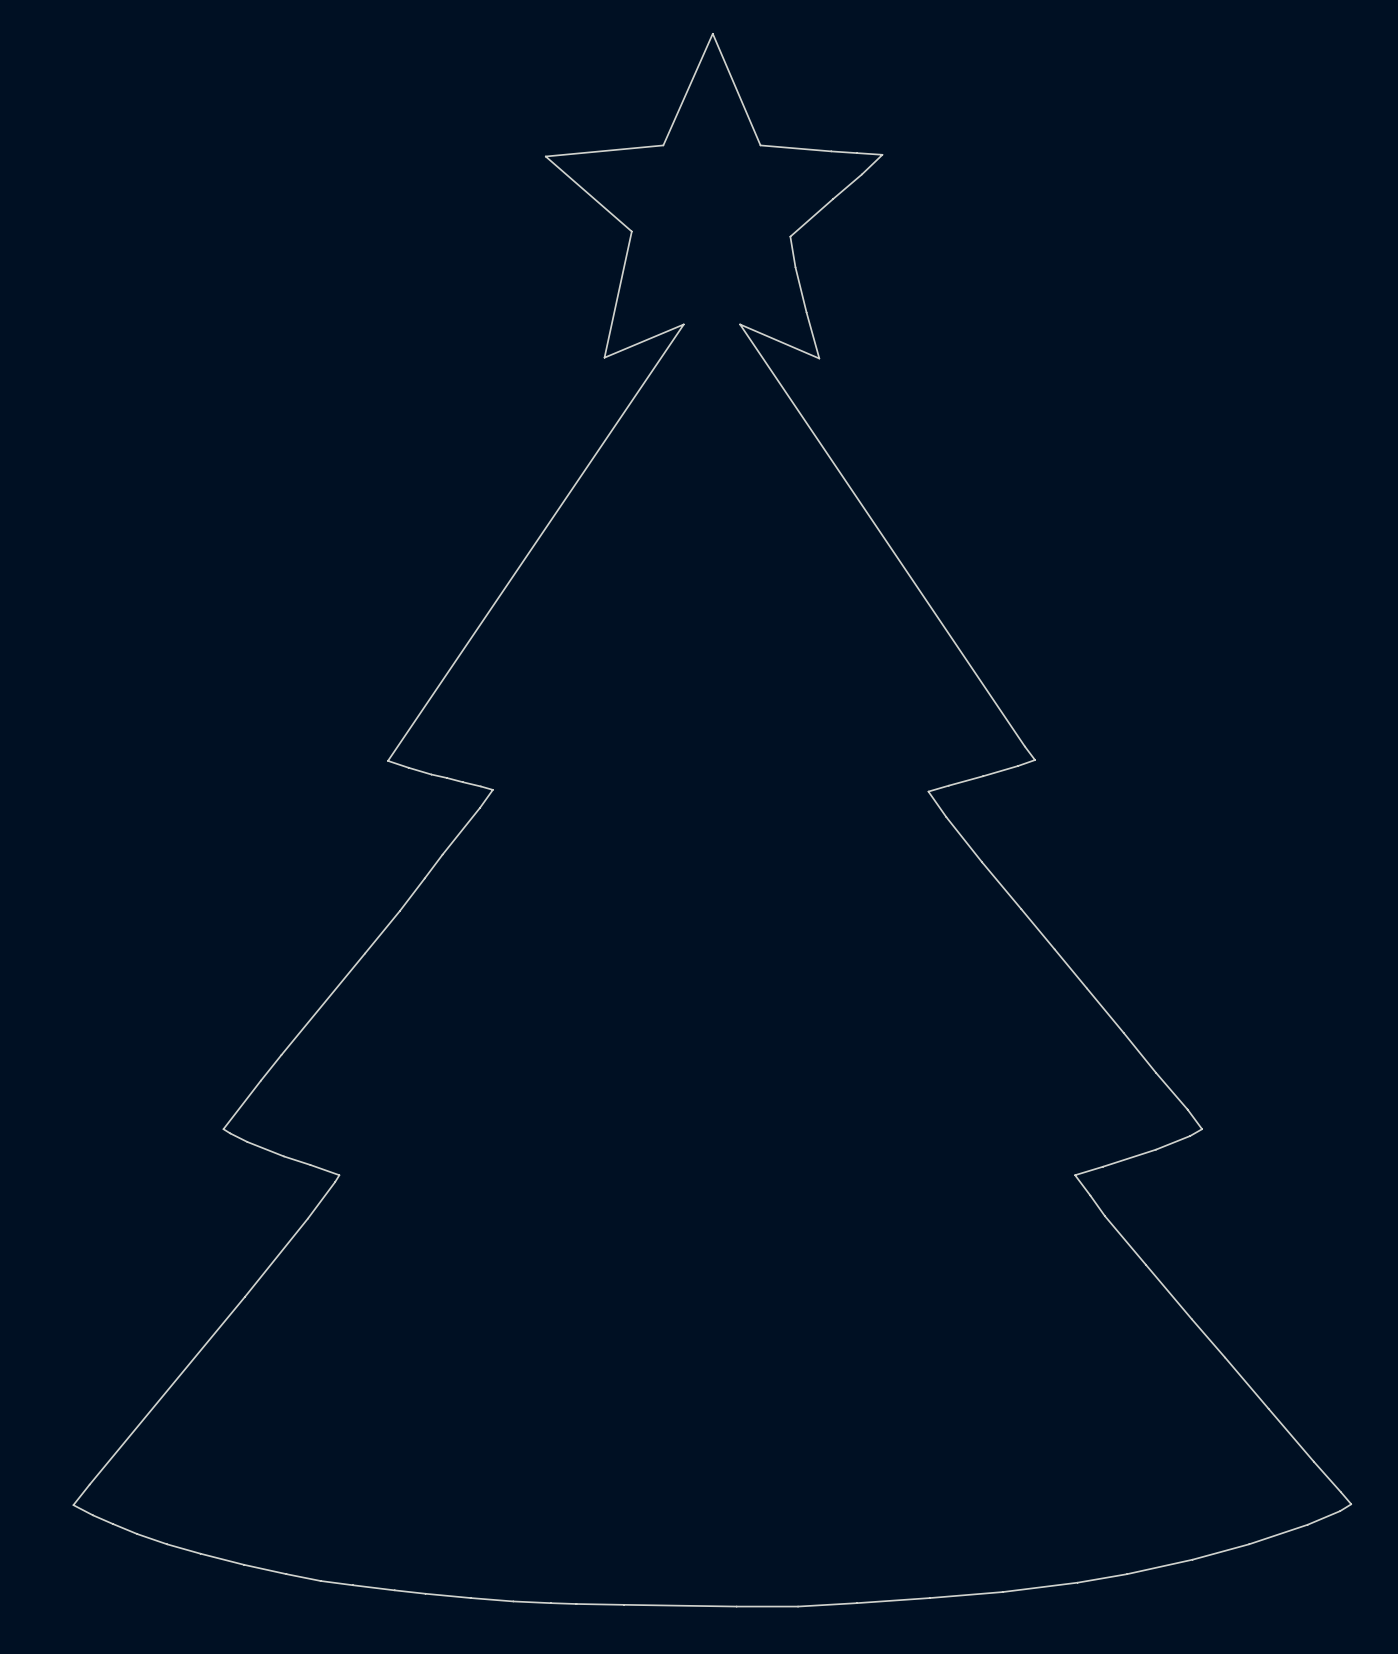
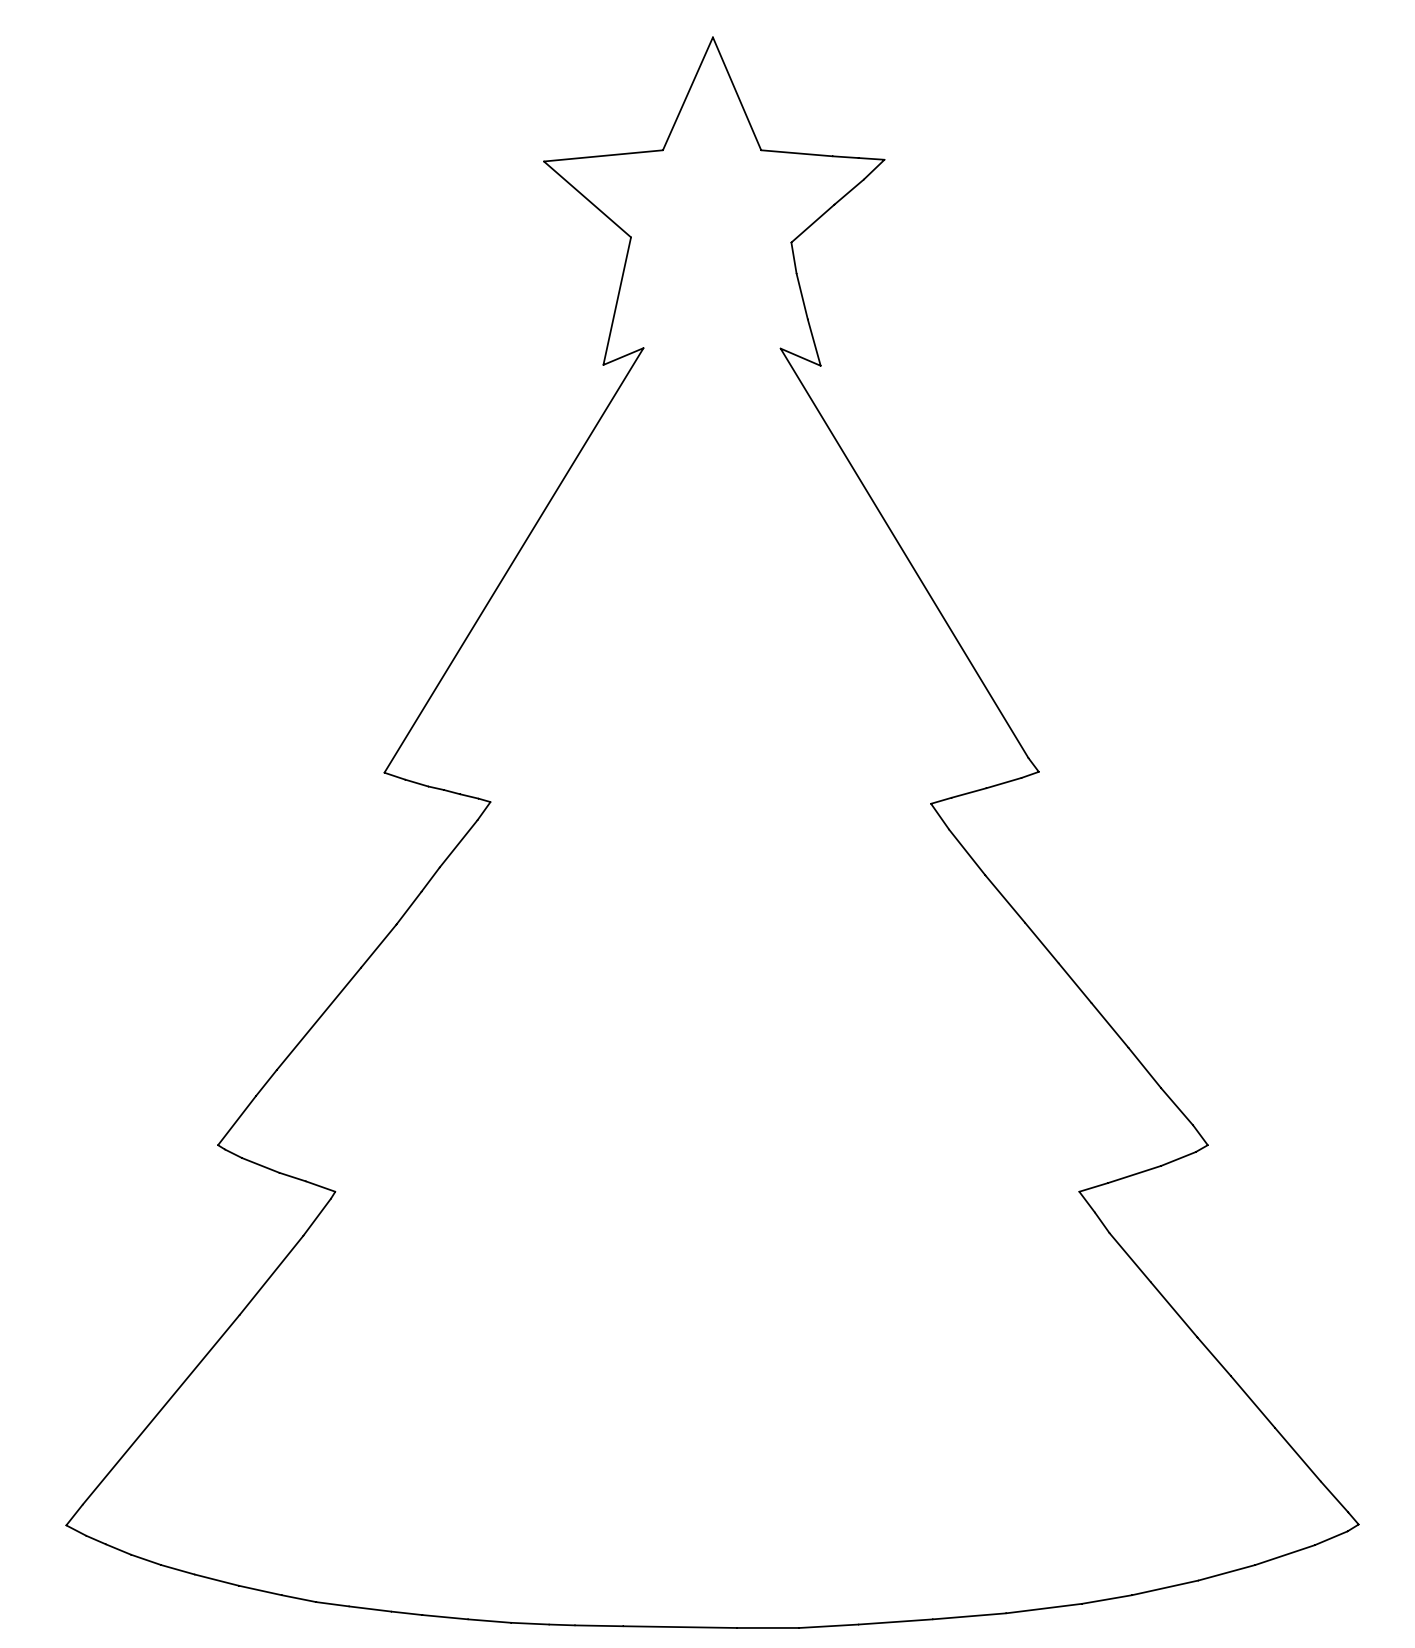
board edge: (644, 341) (683, 324) (388, 760) -> (643, 348) (384, 772)
board edge: (779, 341) (740, 324) (1024, 746) -> (780, 348) (1028, 758)

